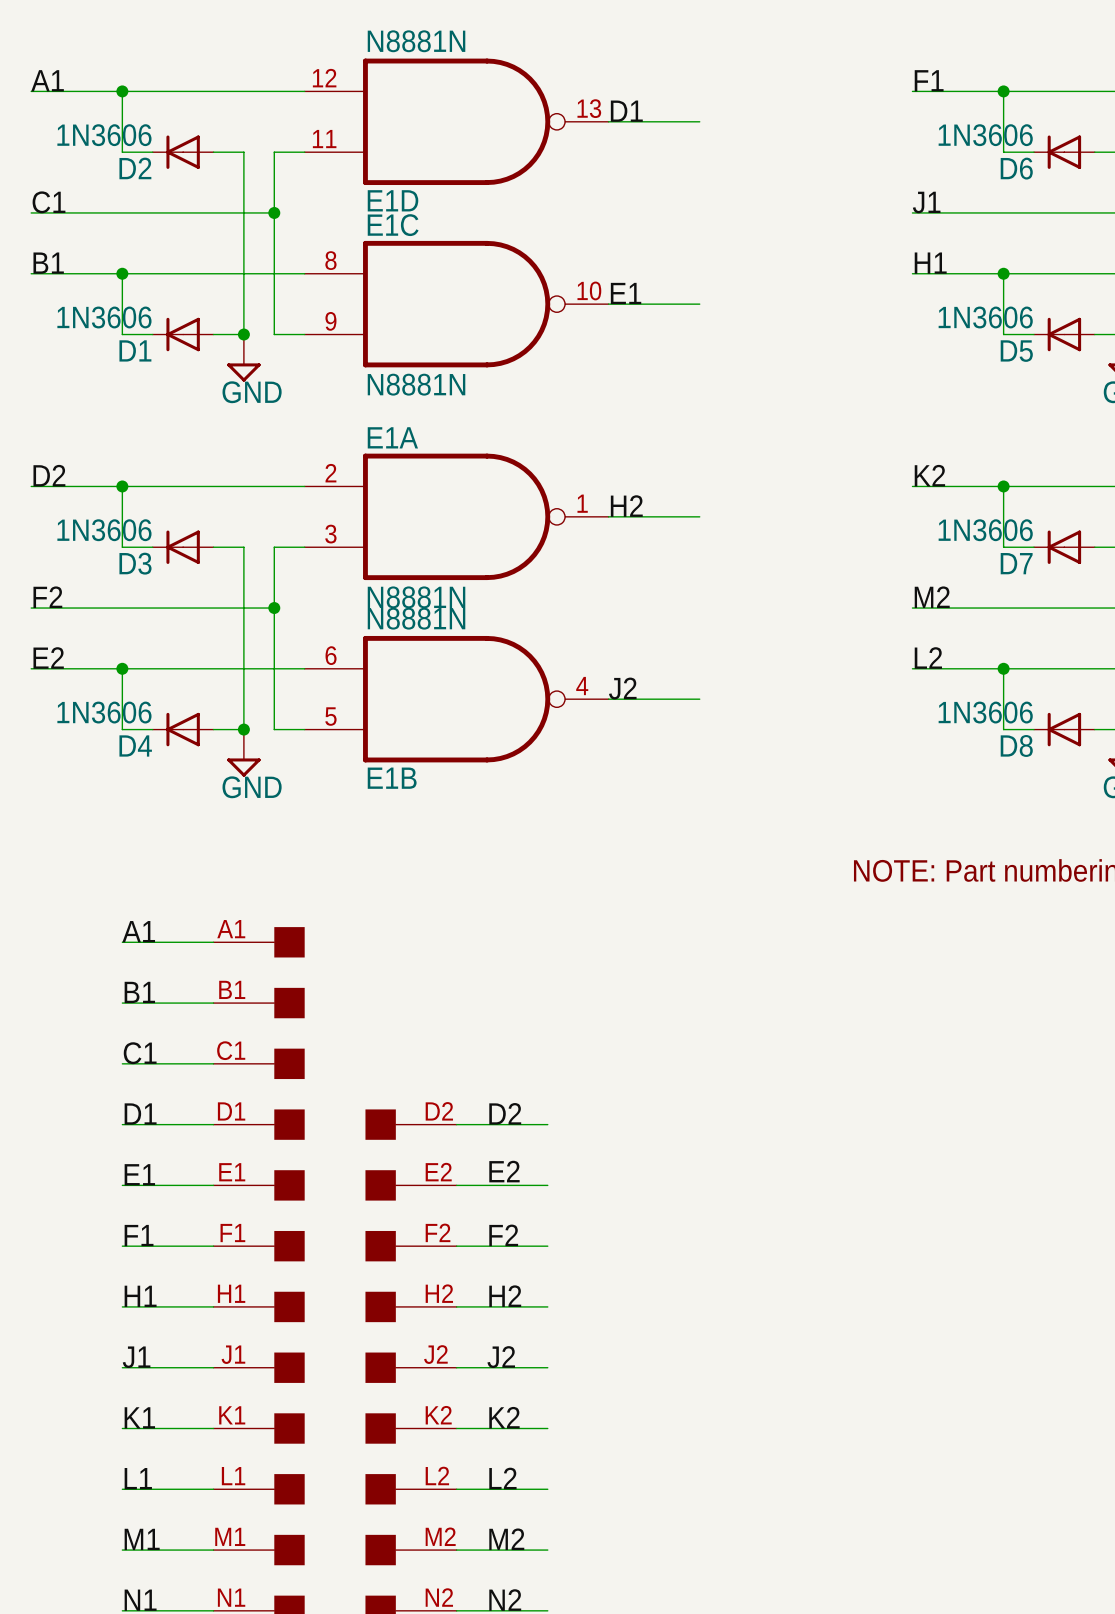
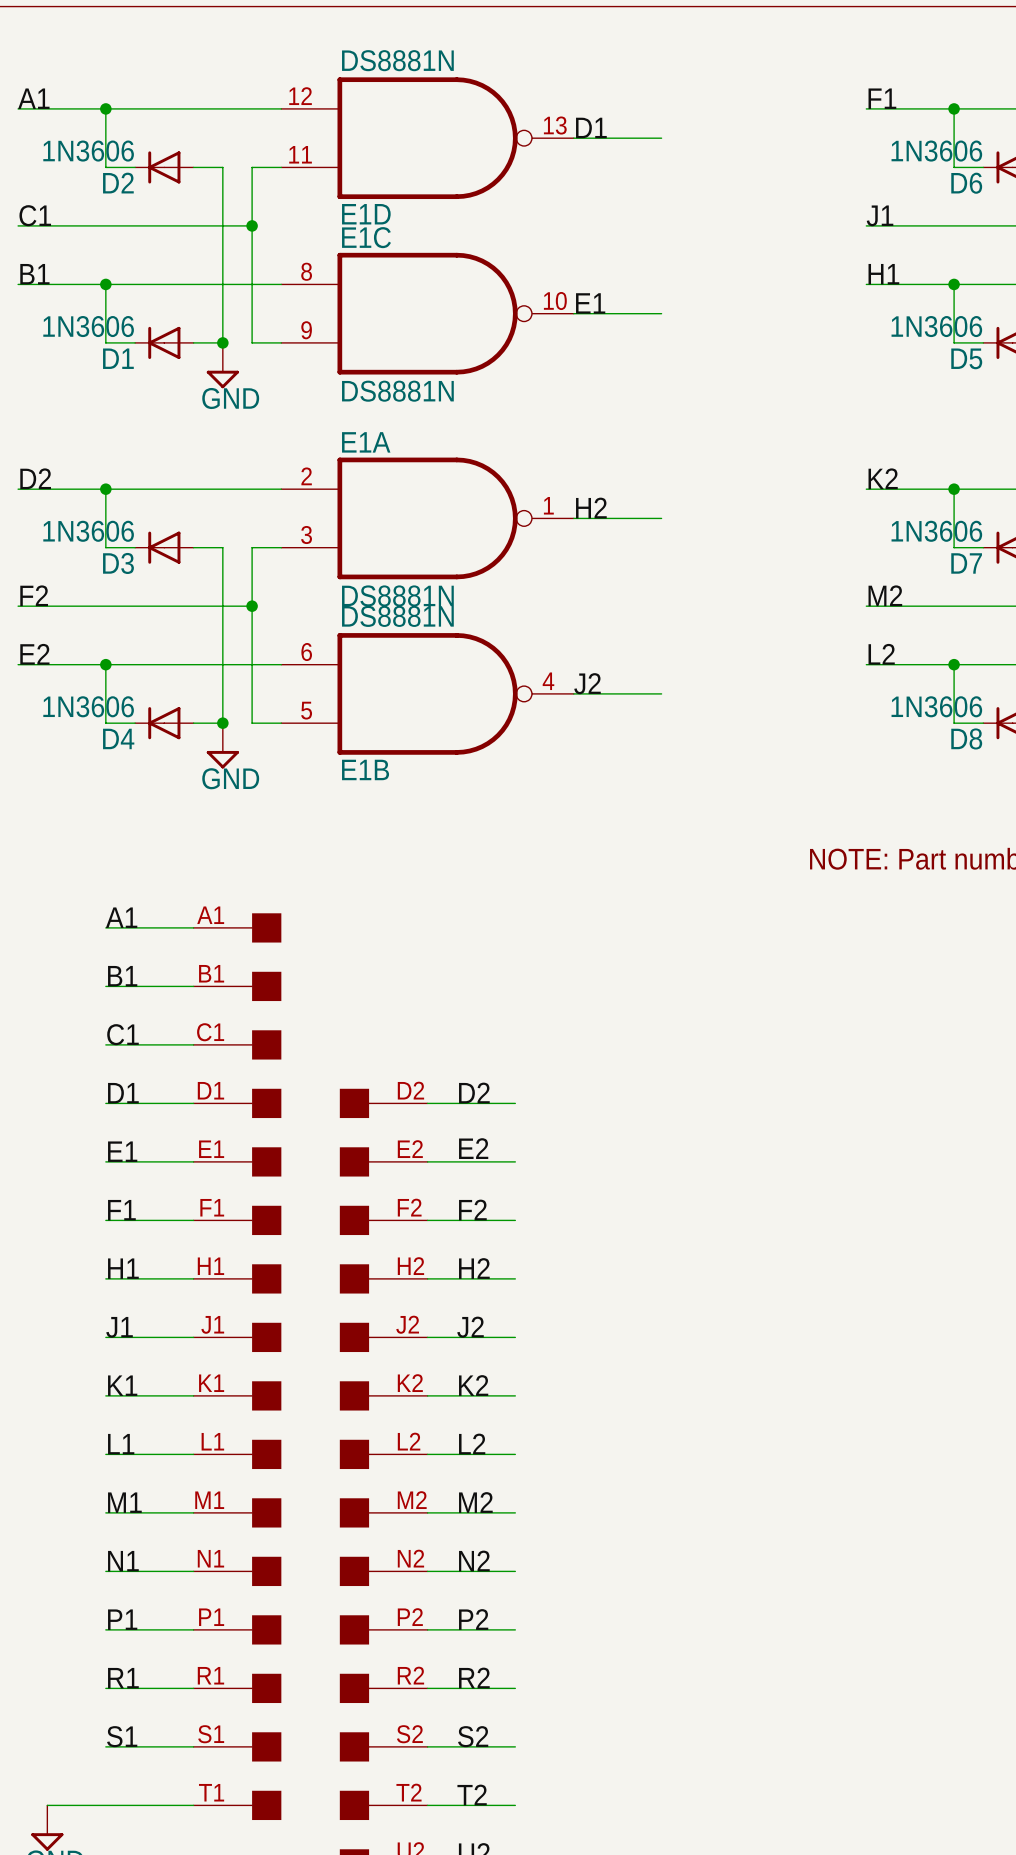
E1D value: N8881N (416, 41) -> DS8881N (397, 60)
E1C value: N8881N (416, 384) -> DS8881N (397, 391)
E1A value: N8881N (416, 597) -> DS8881N (397, 595)
E1B value: N8881N (416, 618) -> DS8881N (397, 616)

